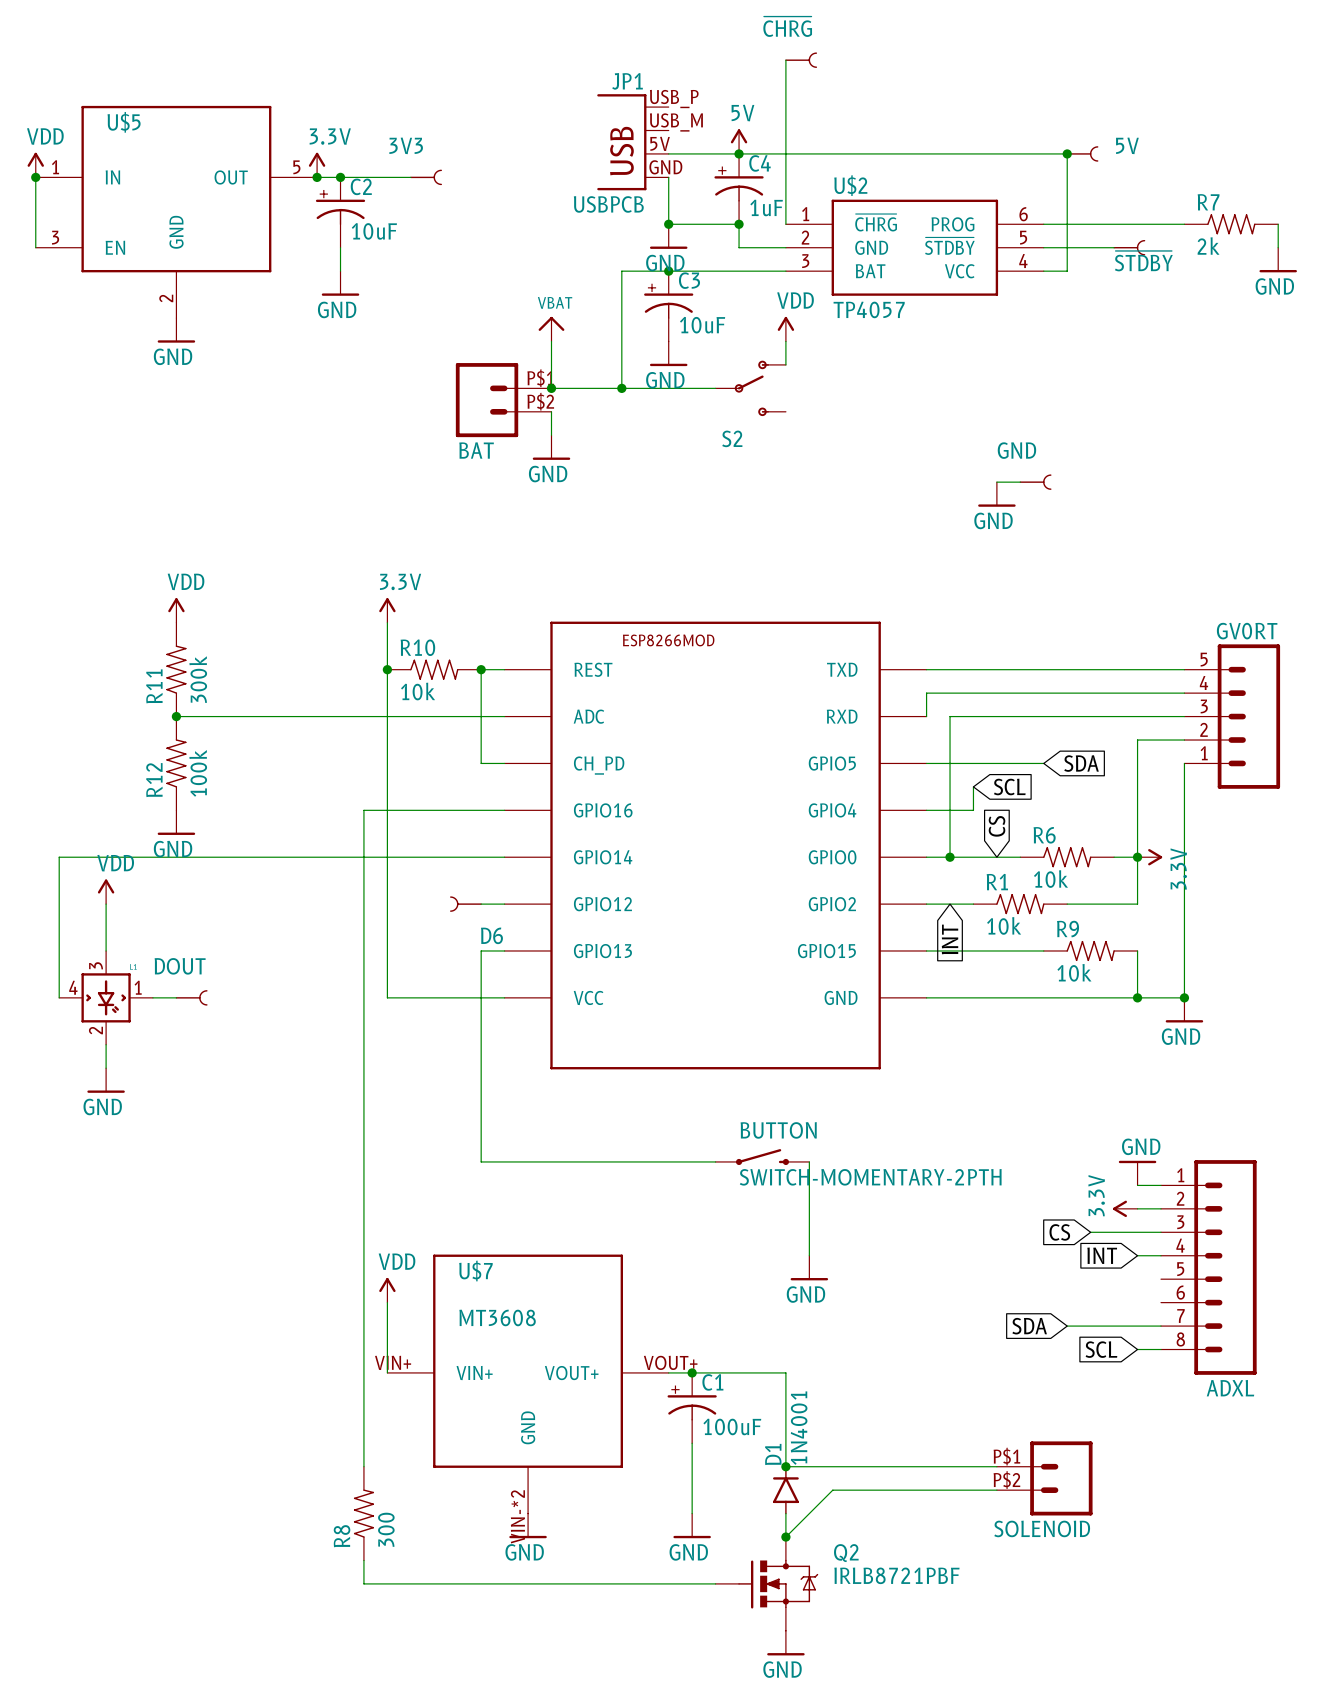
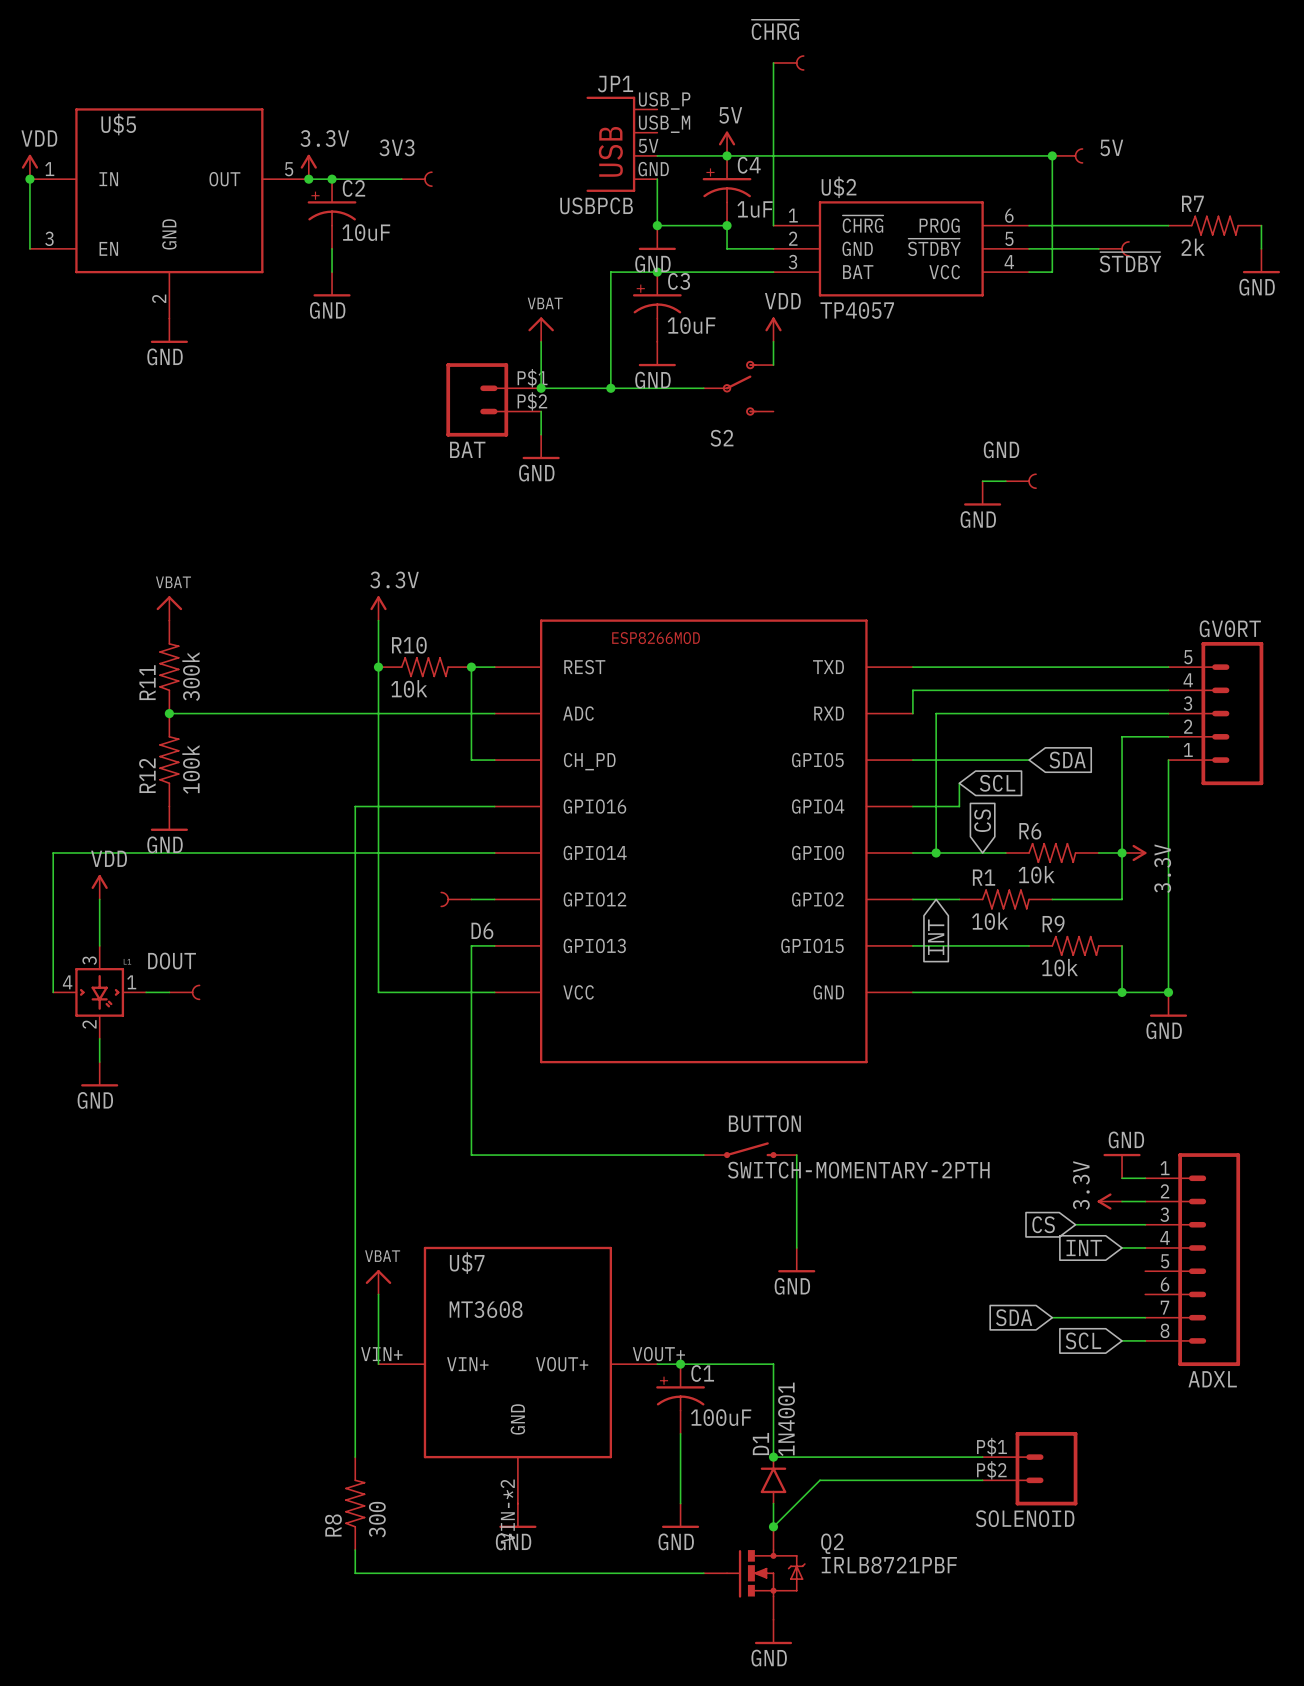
power symbol: VDD (176, 610) -> VBAT (169, 608)
power symbol: VDD (387, 1290) -> VBAT (378, 1282)

